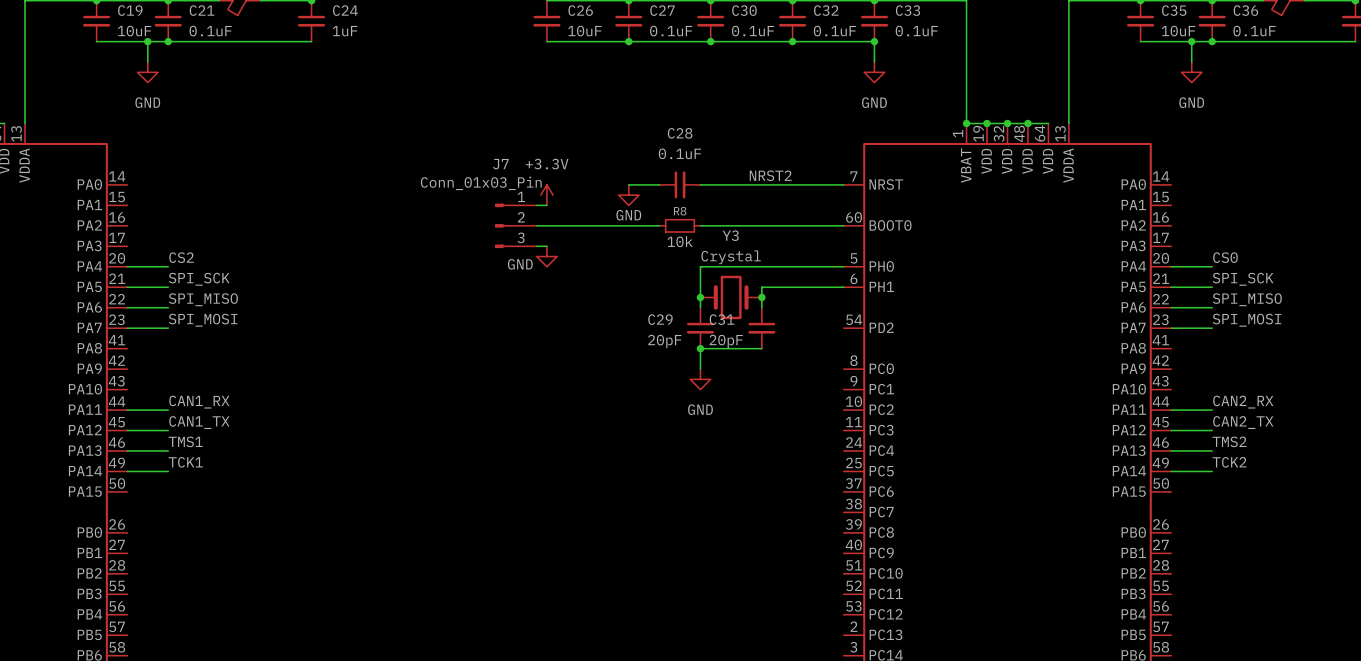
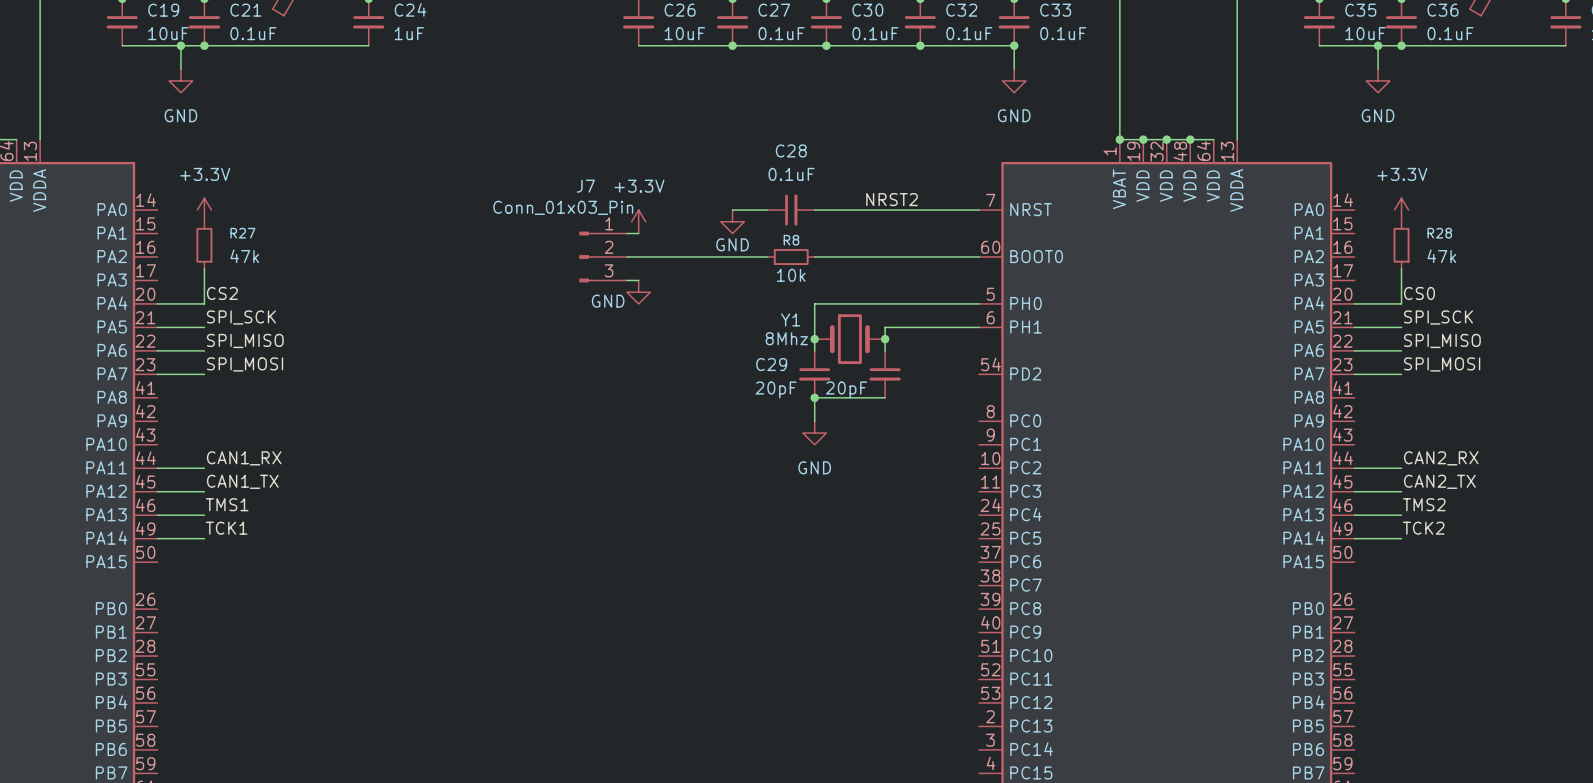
power symbol: none -> +3.3V (204, 210)
power symbol: none -> +3.3V (1401, 210)
R27: none -> 47k (204, 245)
R28: none -> 47k (1401, 245)
Y3 name: Y3 (730, 235) -> Y1 (790, 319)
wire: none -> (204, 268) (204, 303)
wire: none -> (1401, 268) (1401, 303)
Y3 value: Crystal (731, 257) -> 8Mhz (786, 338)
C31 name: C31 (722, 319) -> none

